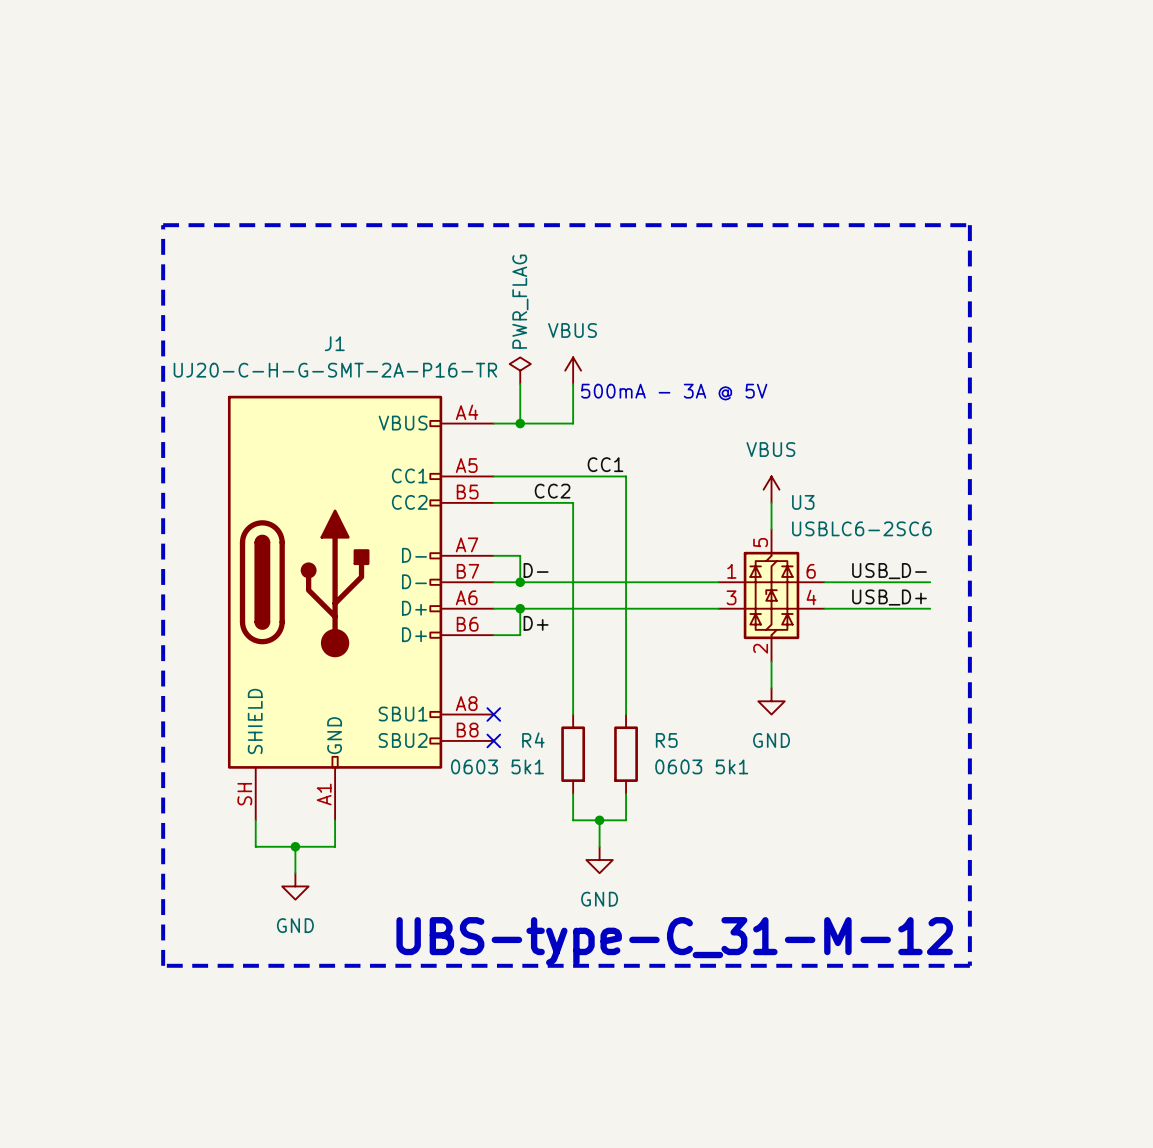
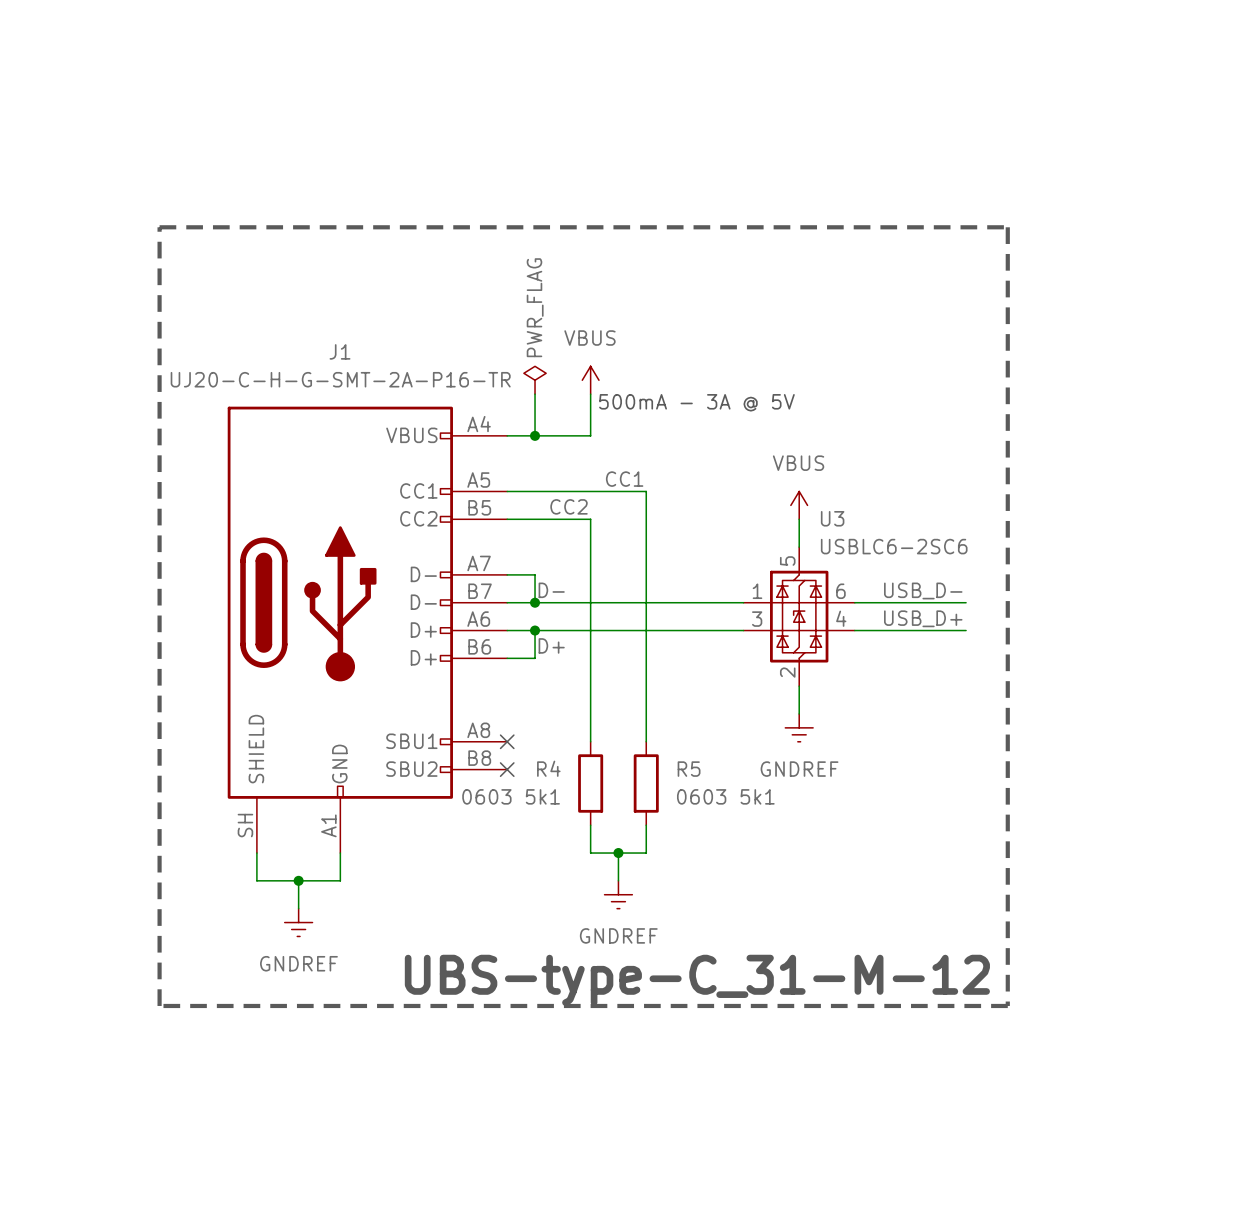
power symbol: GND (771, 701) -> GNDREF (799, 727)
power symbol: GND (599, 859) -> GNDREF (618, 894)
power symbol: GND (295, 886) -> GNDREF (298, 922)

